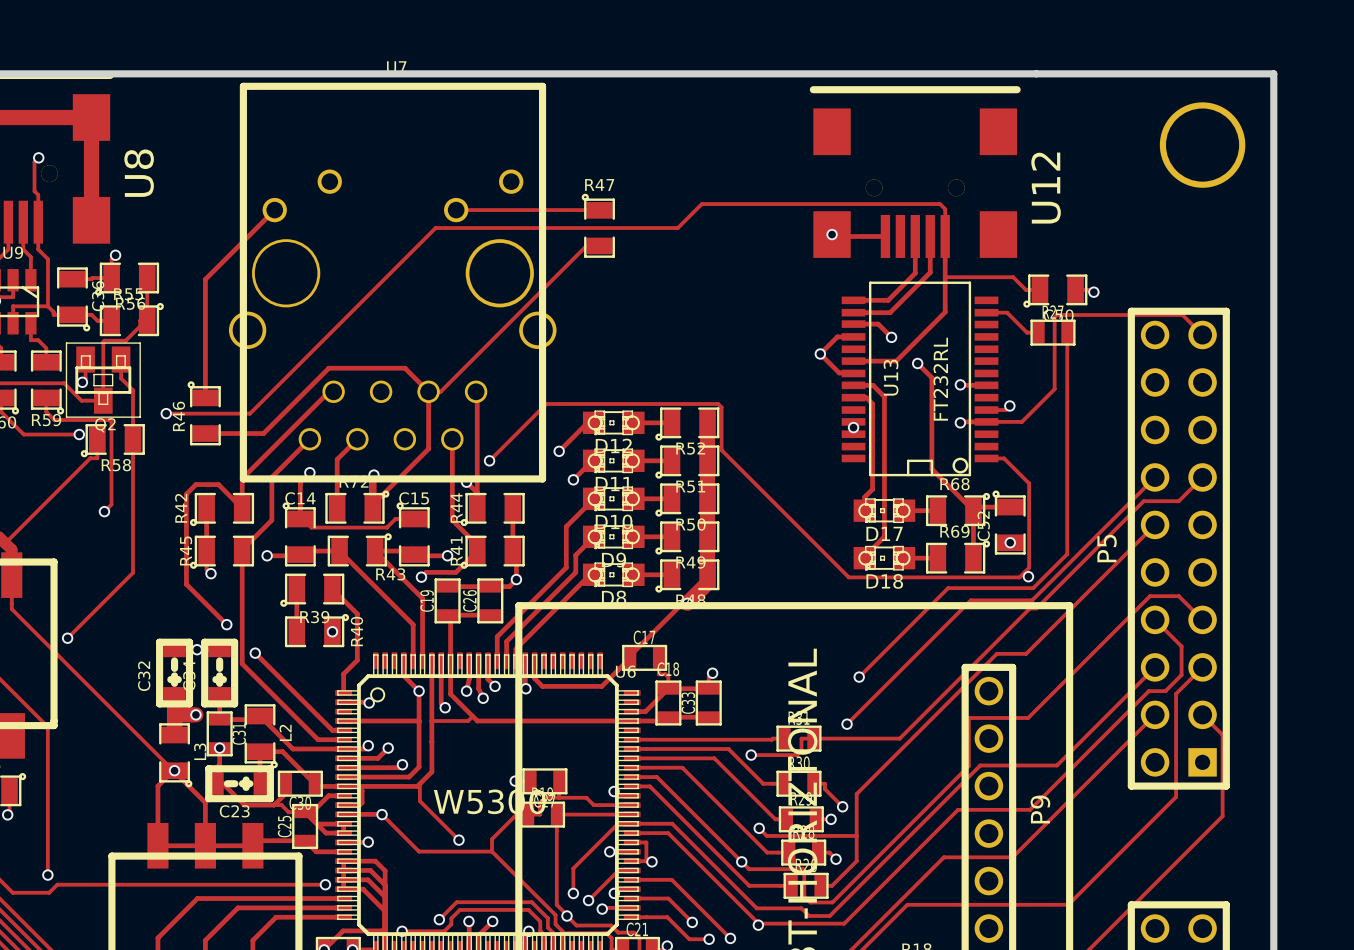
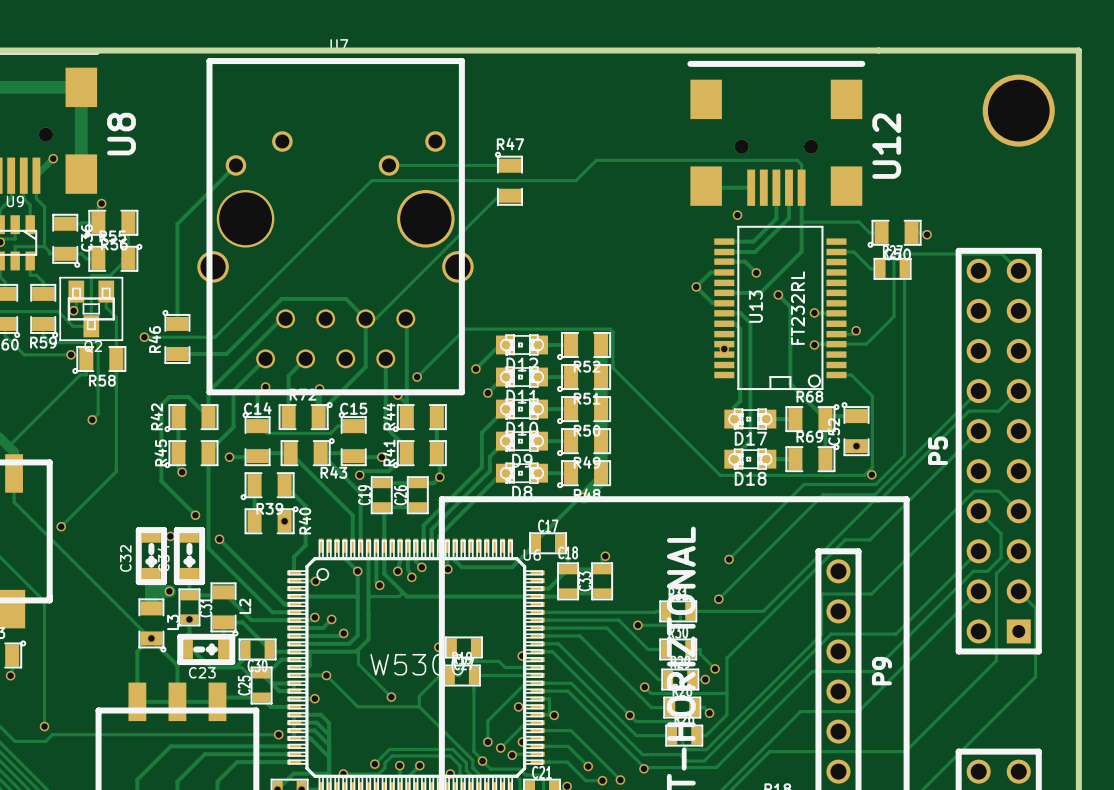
track: (38, 157) (34, 162) (34, 191) (38, 194) (38, 222) -> (53, 158) (36, 175)
via position: (38, 157) -> (53, 158)
via position: (832, 234) -> (737, 215)

